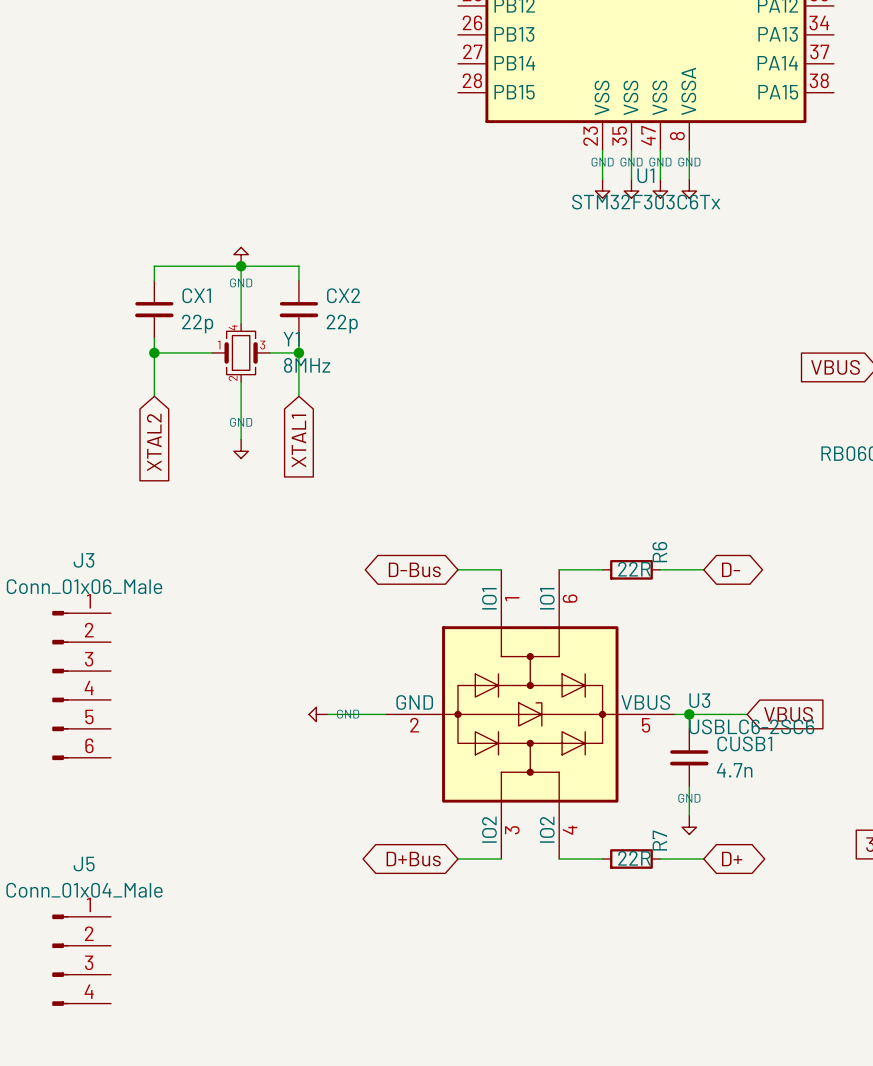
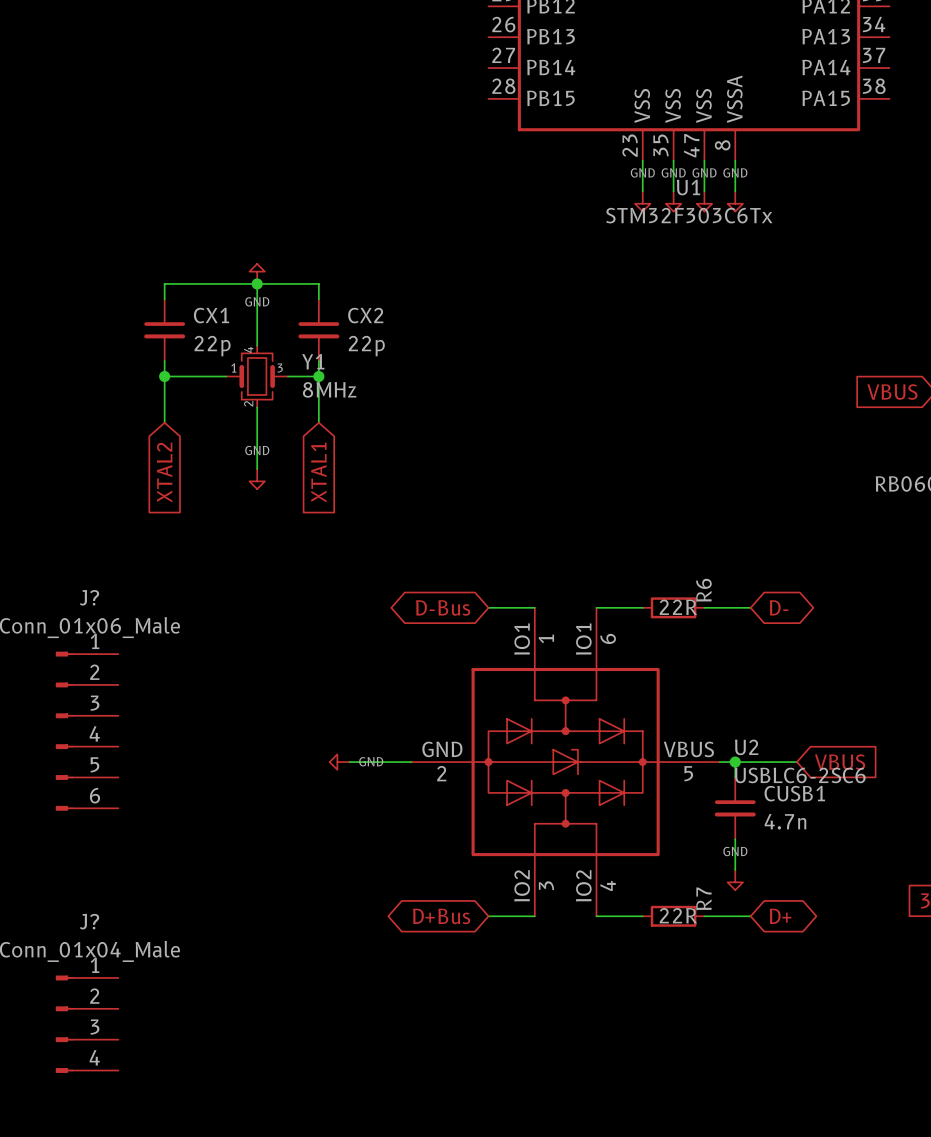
J3 name: J3 (84, 560) -> J? (89, 597)
U3 name: U3 (699, 700) -> U2 (746, 747)
J5 name: J5 (84, 864) -> J? (89, 921)

